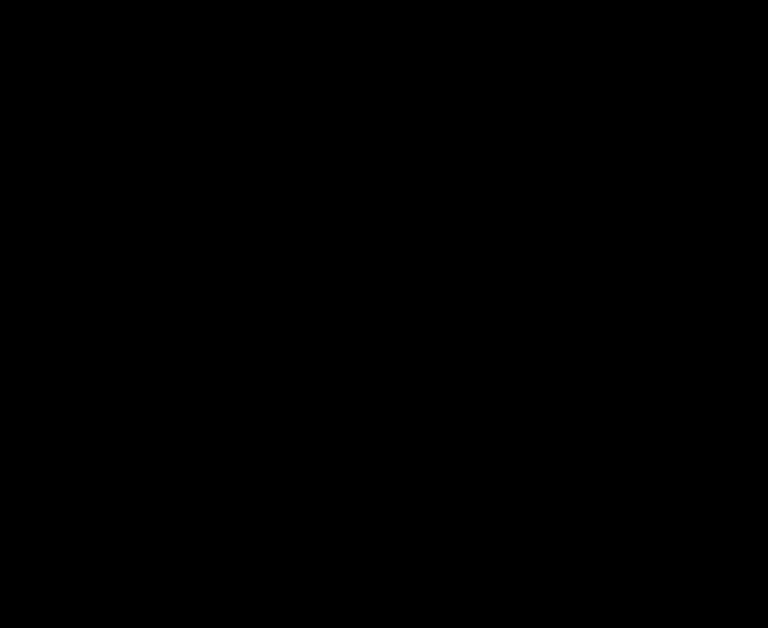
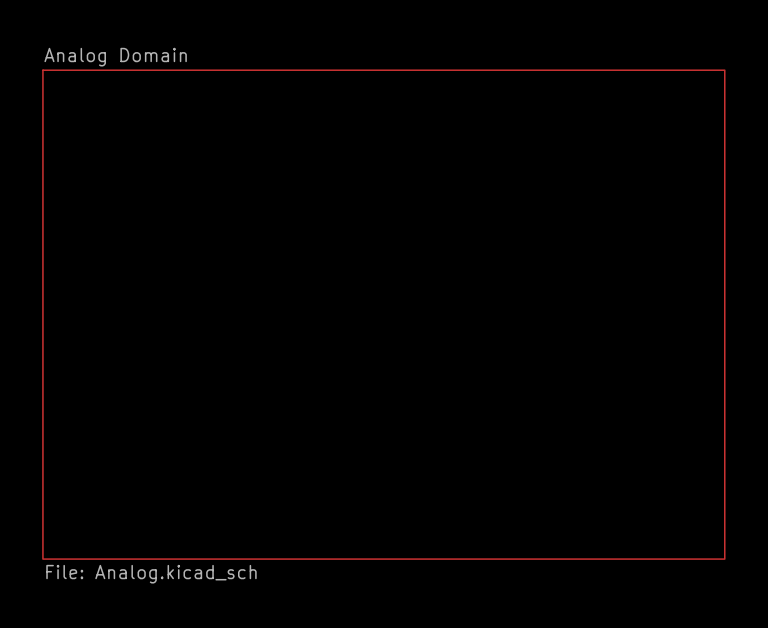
sheet Analog Domain: none -> File: Analog.kicad_sch (383, 314)

